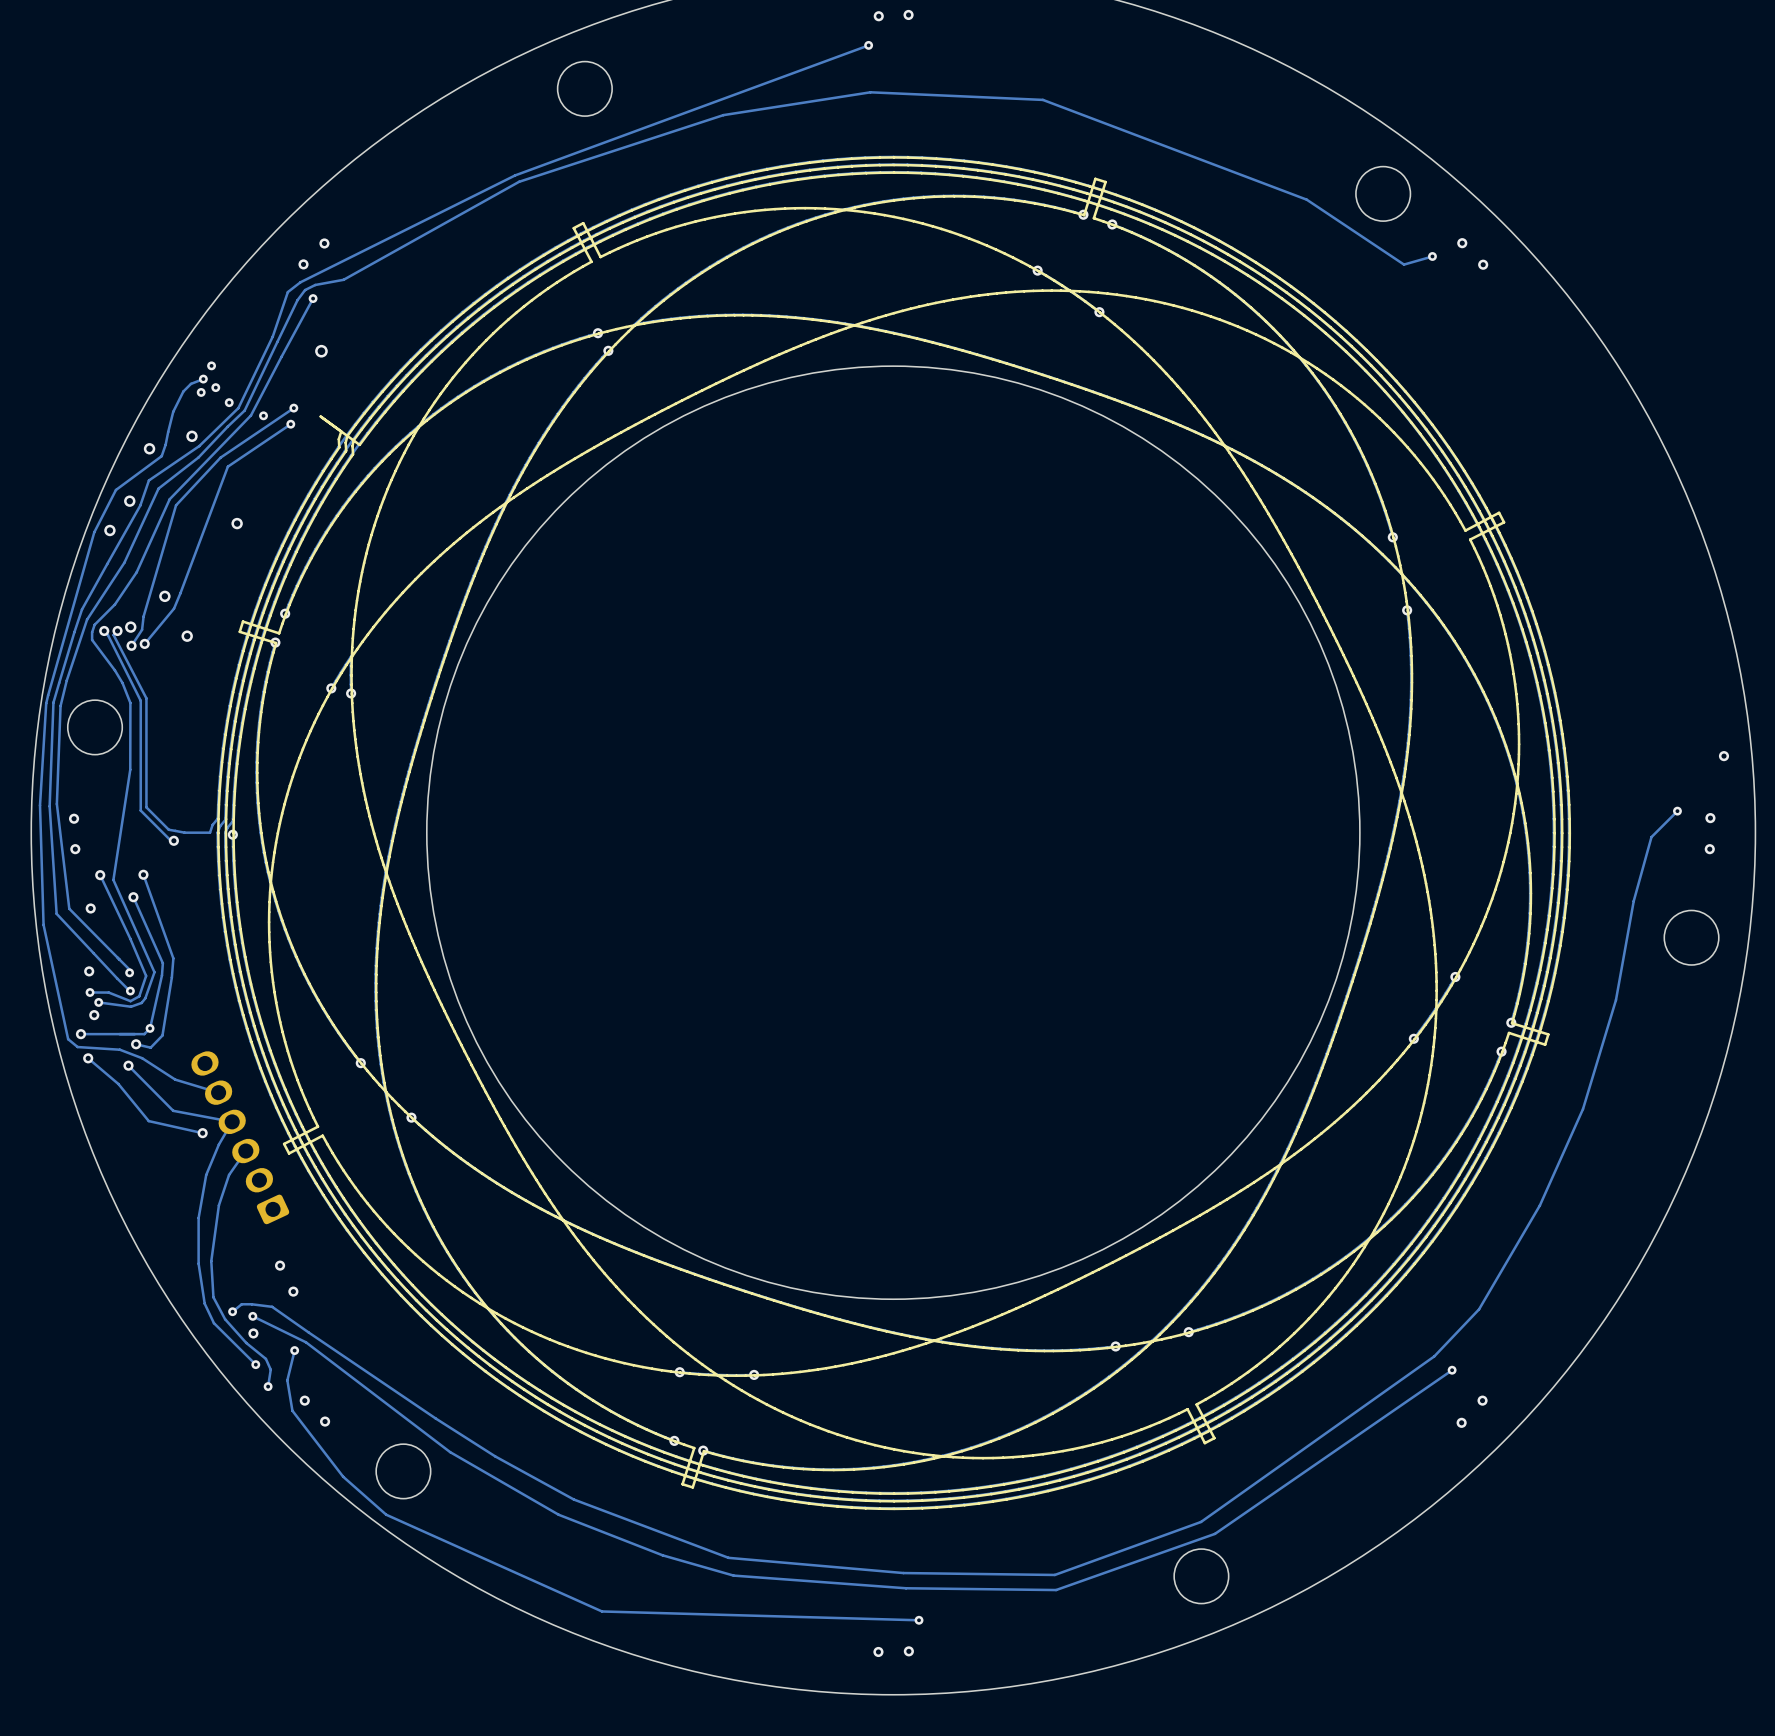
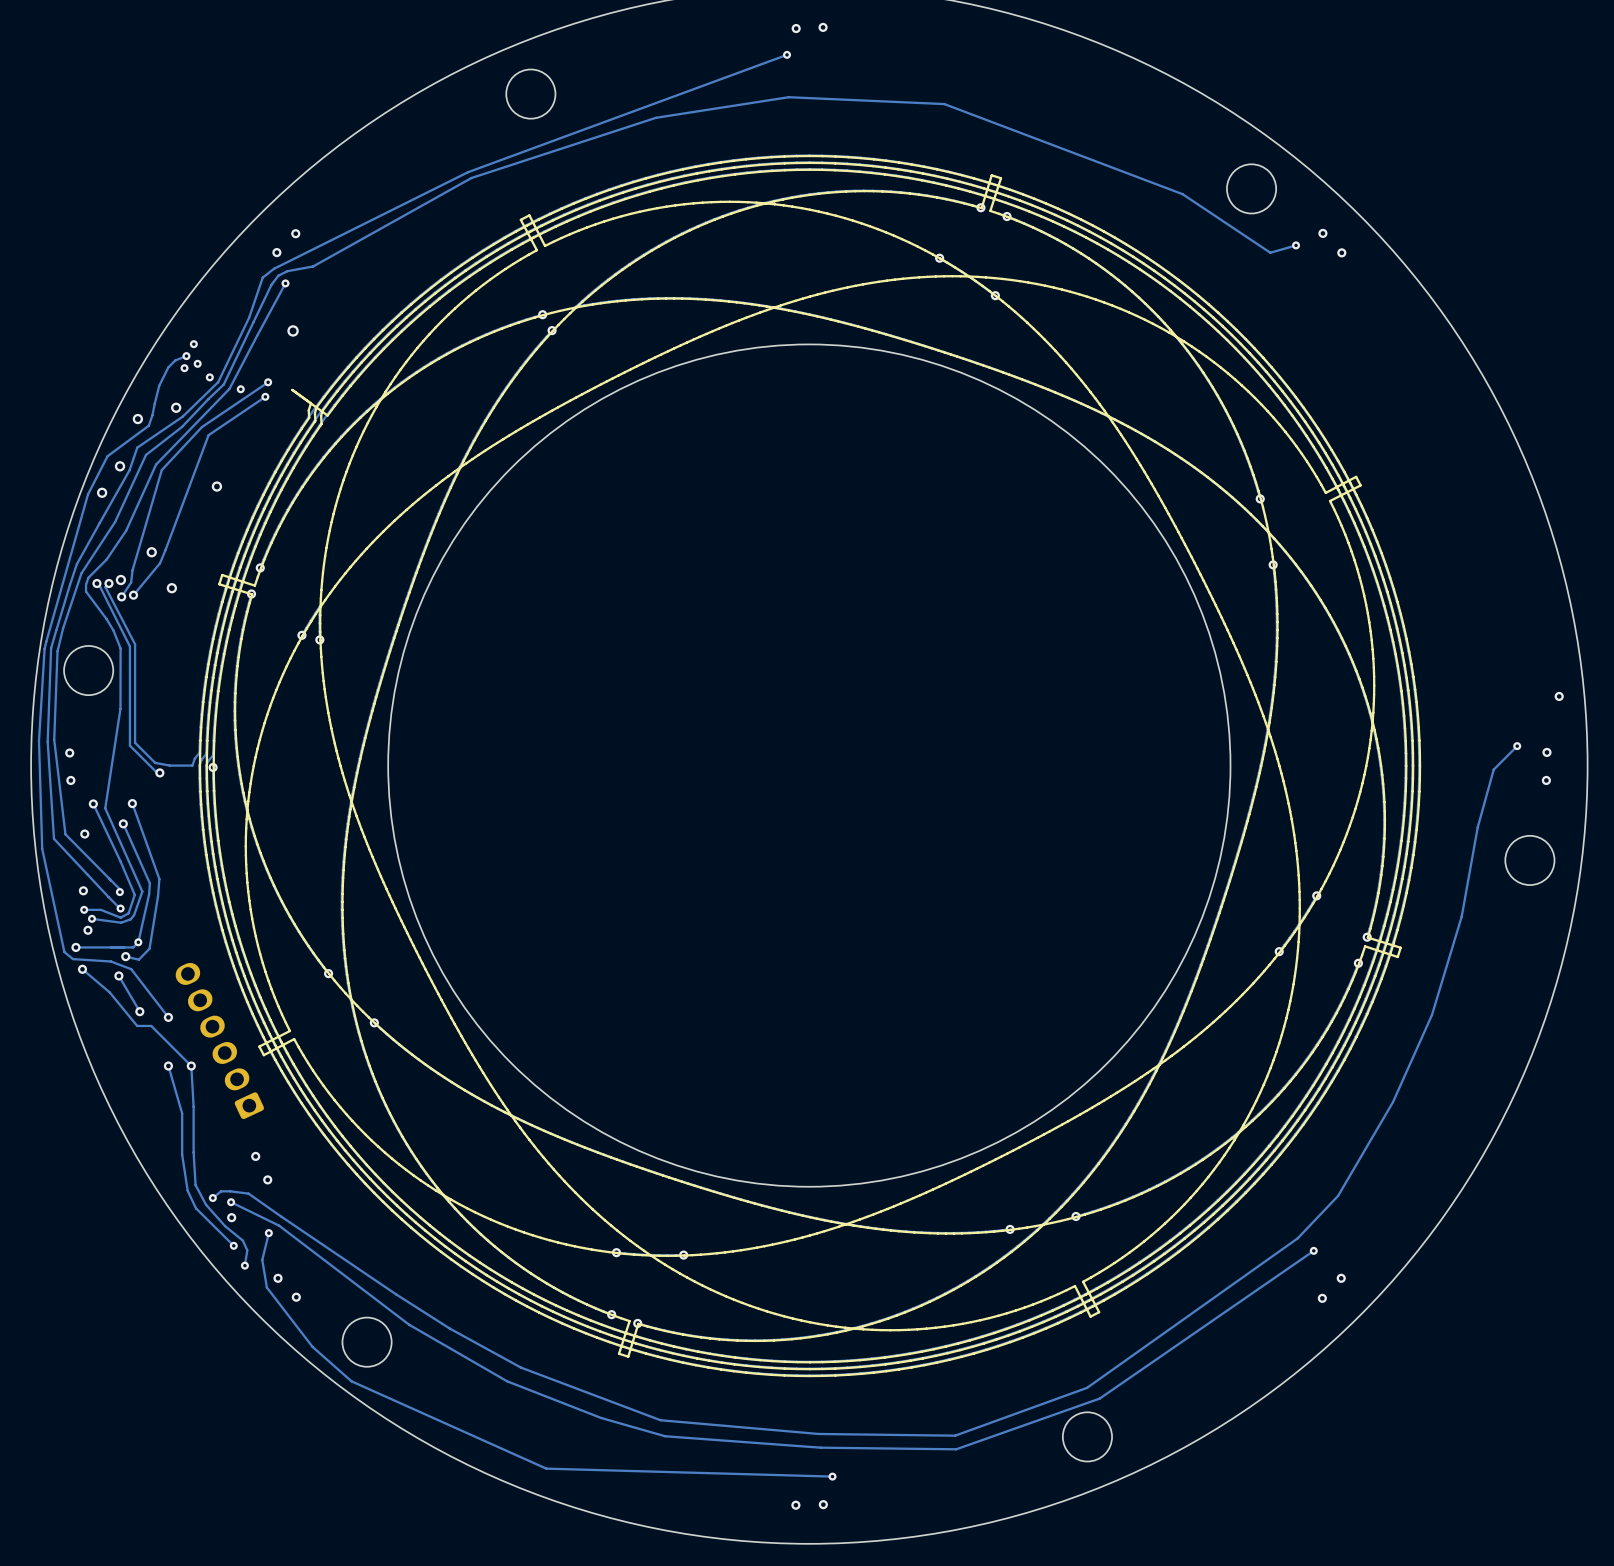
track: (142, 1058) (175, 1079) (218, 1092) -> (131, 969) (168, 1017)
track: (128, 1065) (173, 1110) (232, 1121) (218, 1144) (206, 1174) (198, 1218) -> (168, 1066) (182, 1113)
track: none -> (118, 975) (139, 1011)
via: none -> (139, 1011)
via: none -> (168, 1017)
track: (148, 1121) (202, 1133) -> none
via: (202, 1133) -> none
track: (245, 1151) (229, 1174) (218, 1205) (211, 1261) -> (137, 1025) (151, 1025) (191, 1066) (193, 1152)
via: none -> (168, 1066)
via: none -> (191, 1066)

